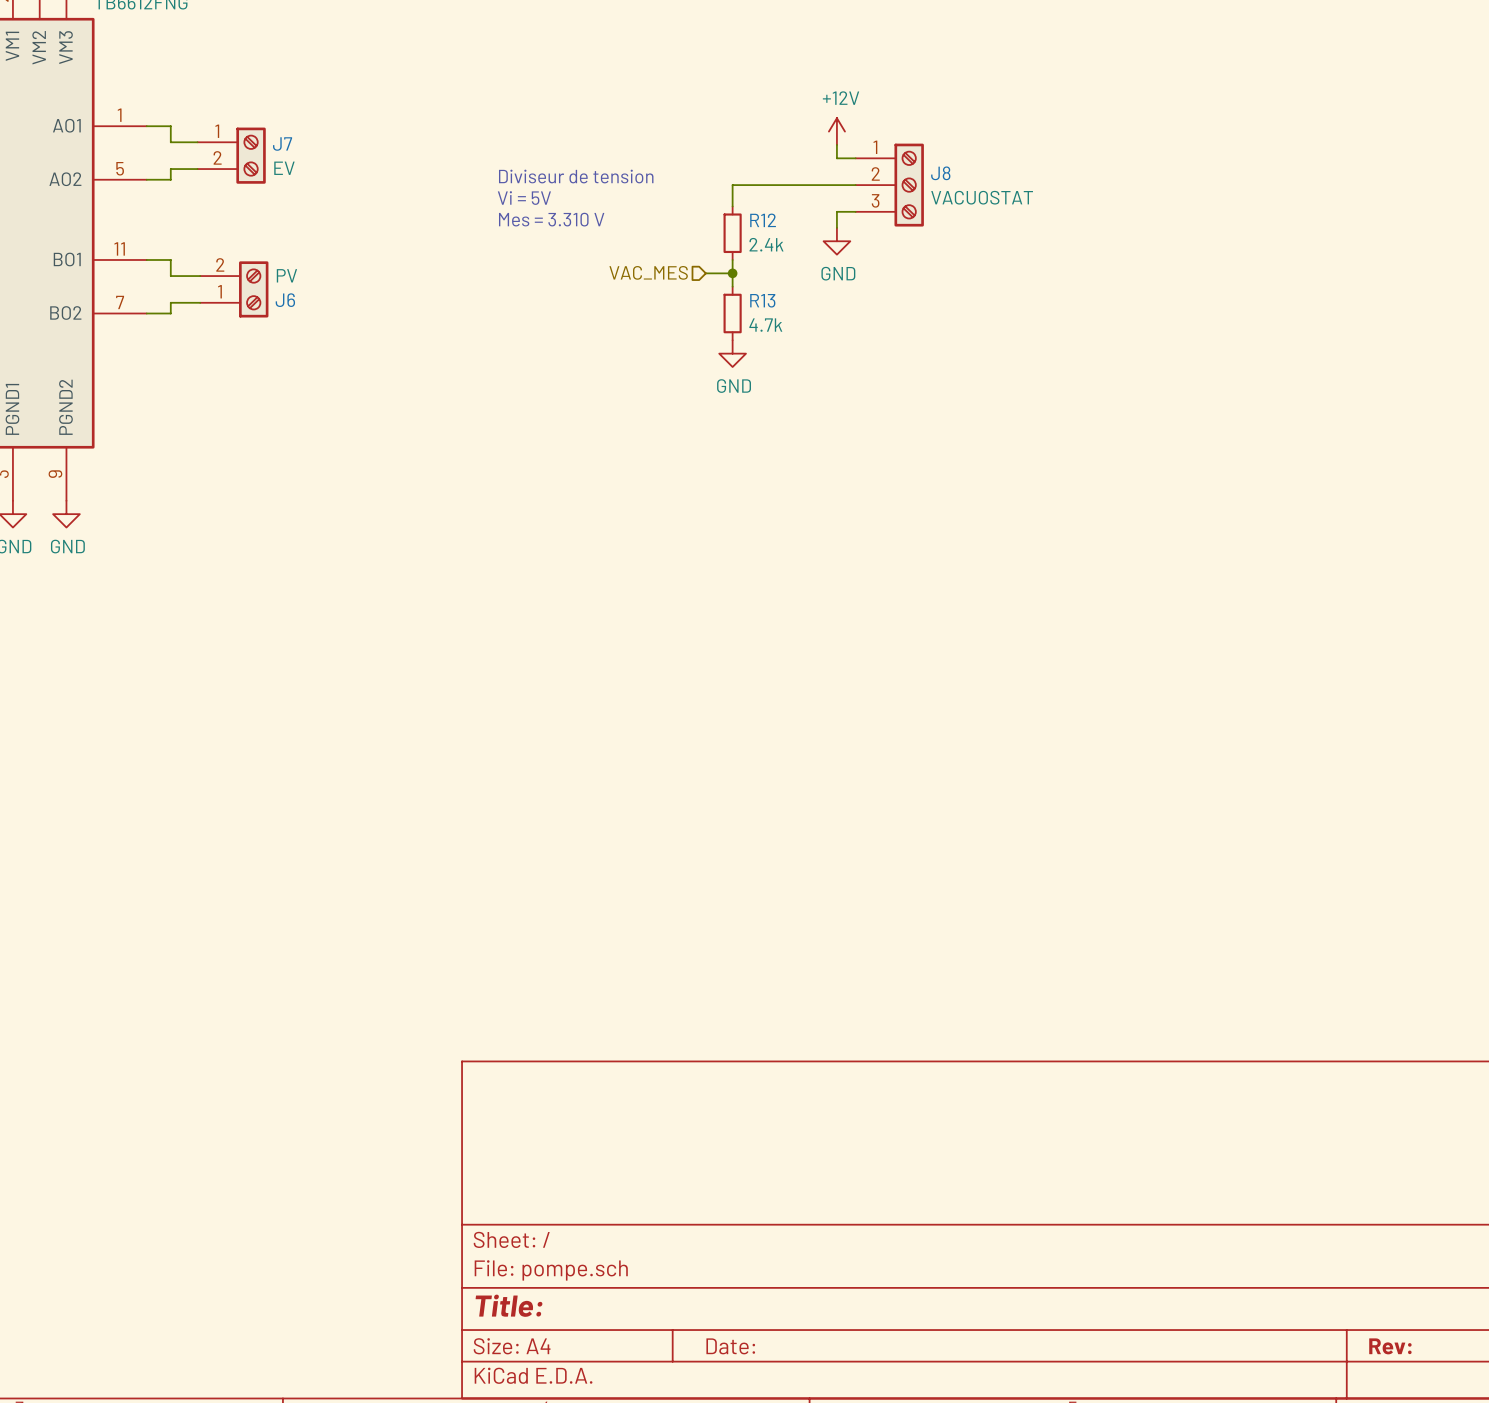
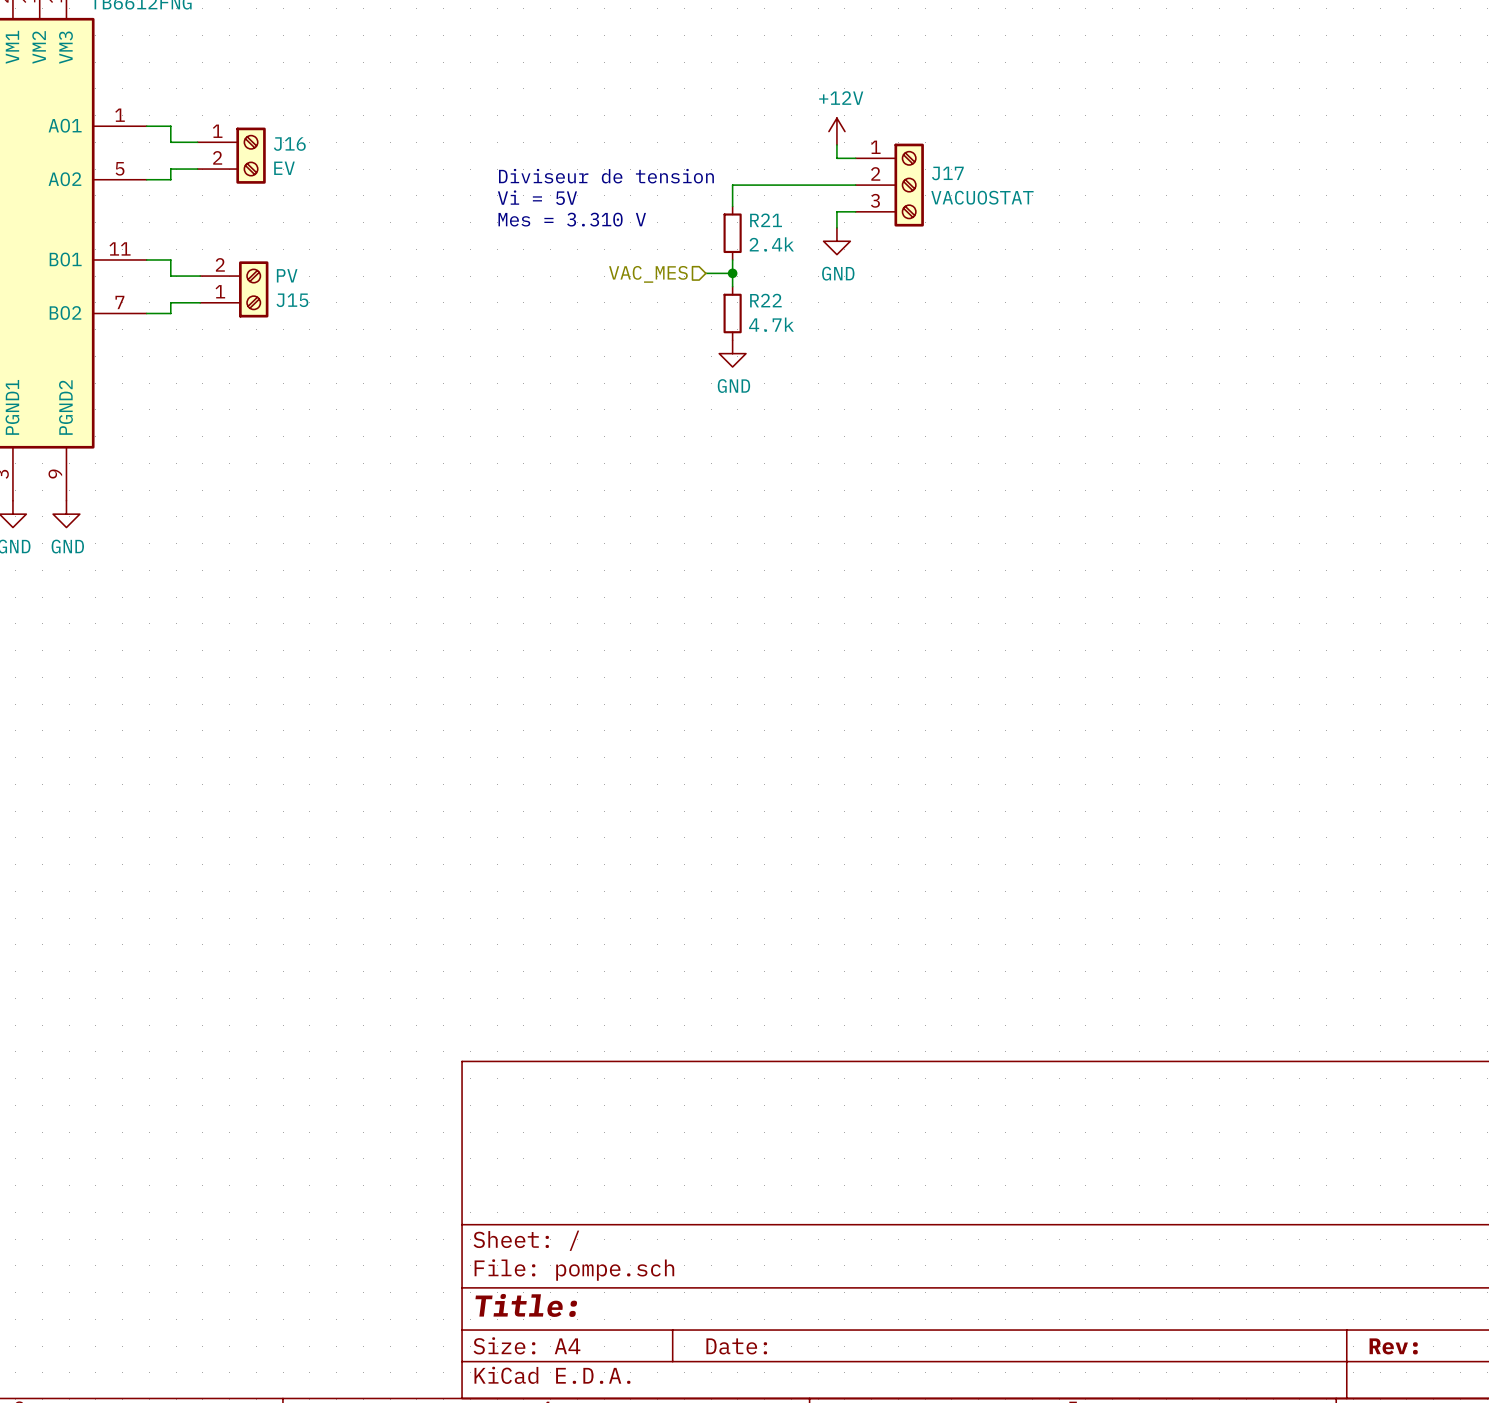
J7 name: J7 (282, 143) -> J16 (289, 144)
J8 name: J8 (940, 173) -> J17 (947, 173)
R12 name: R12 (763, 220) -> R21 (766, 220)
J6 name: J6 (285, 300) -> J15 (292, 300)
R13 name: R13 (762, 300) -> R22 (765, 300)

